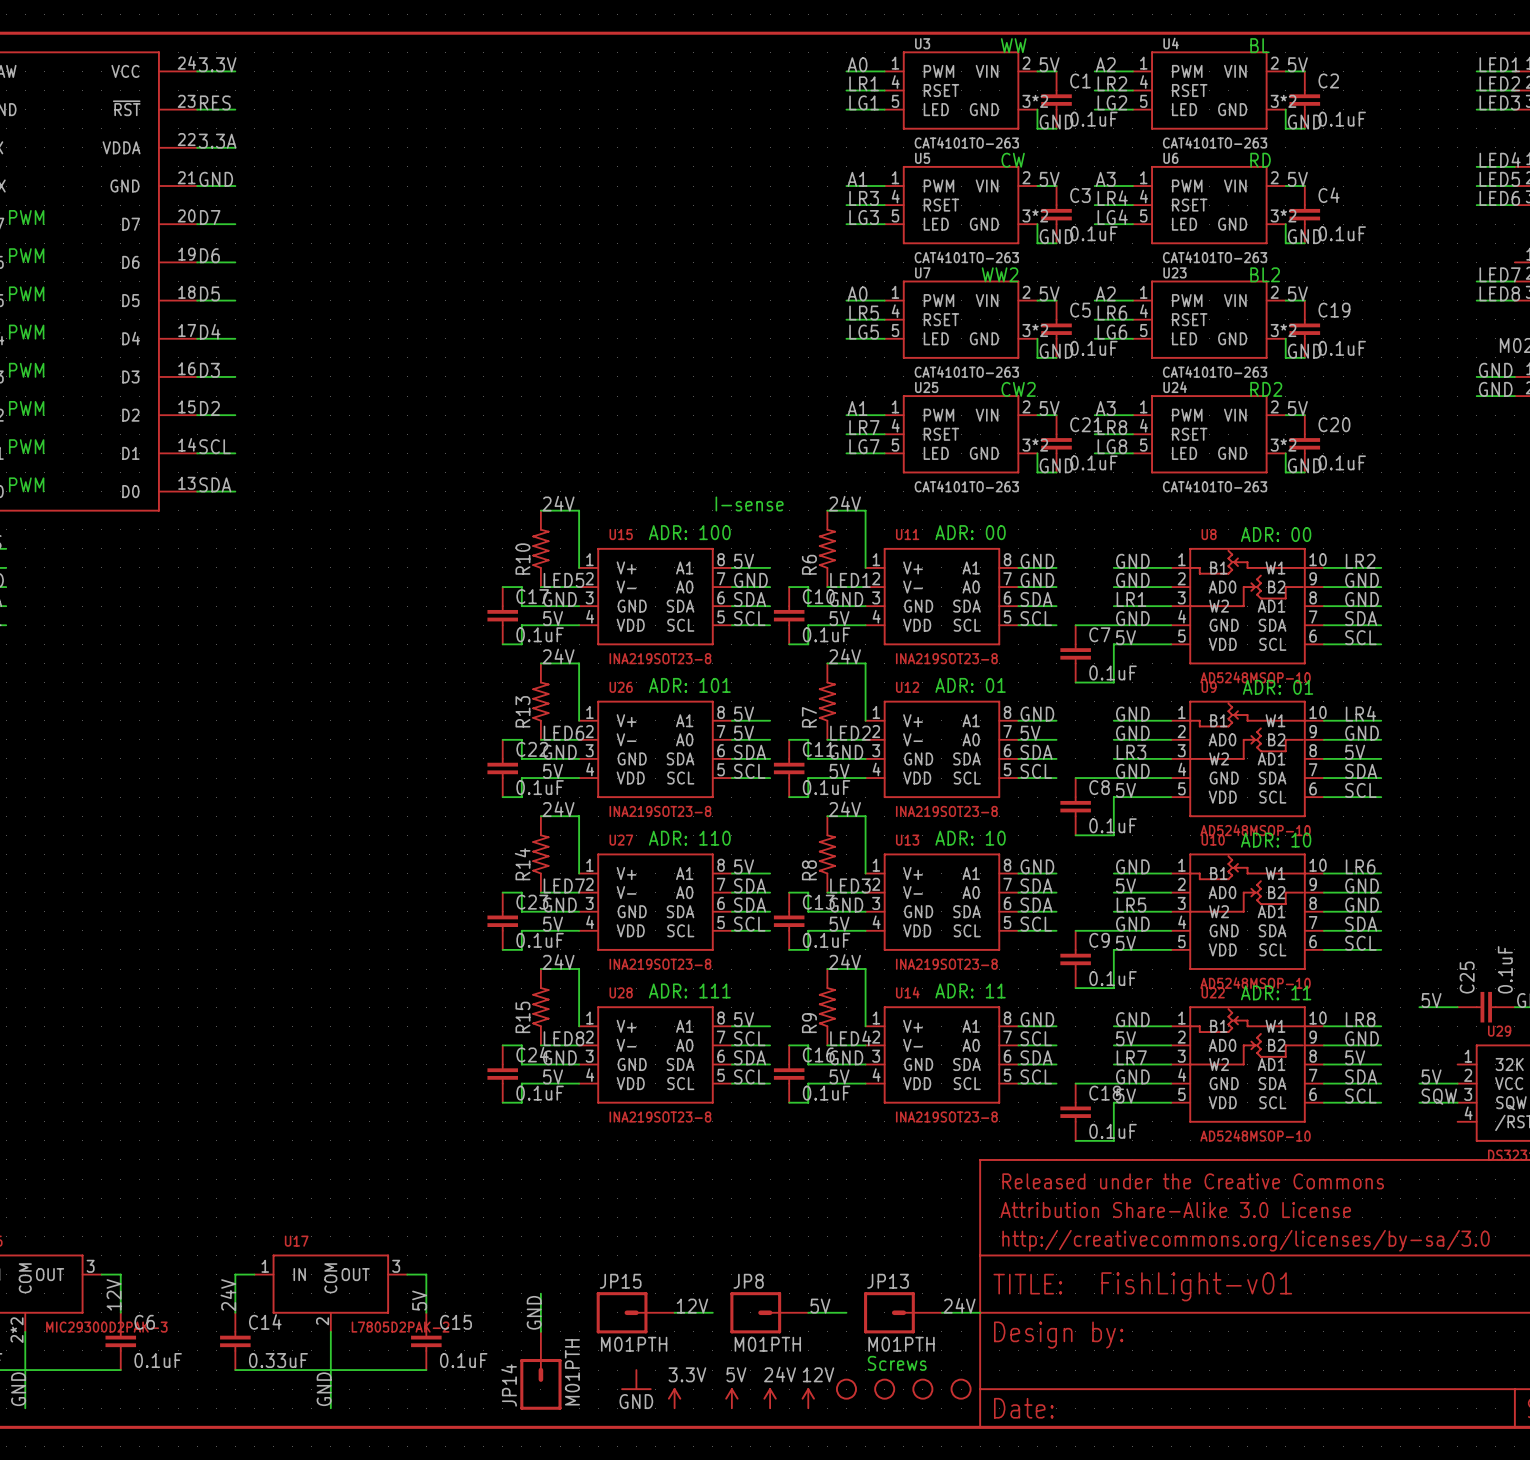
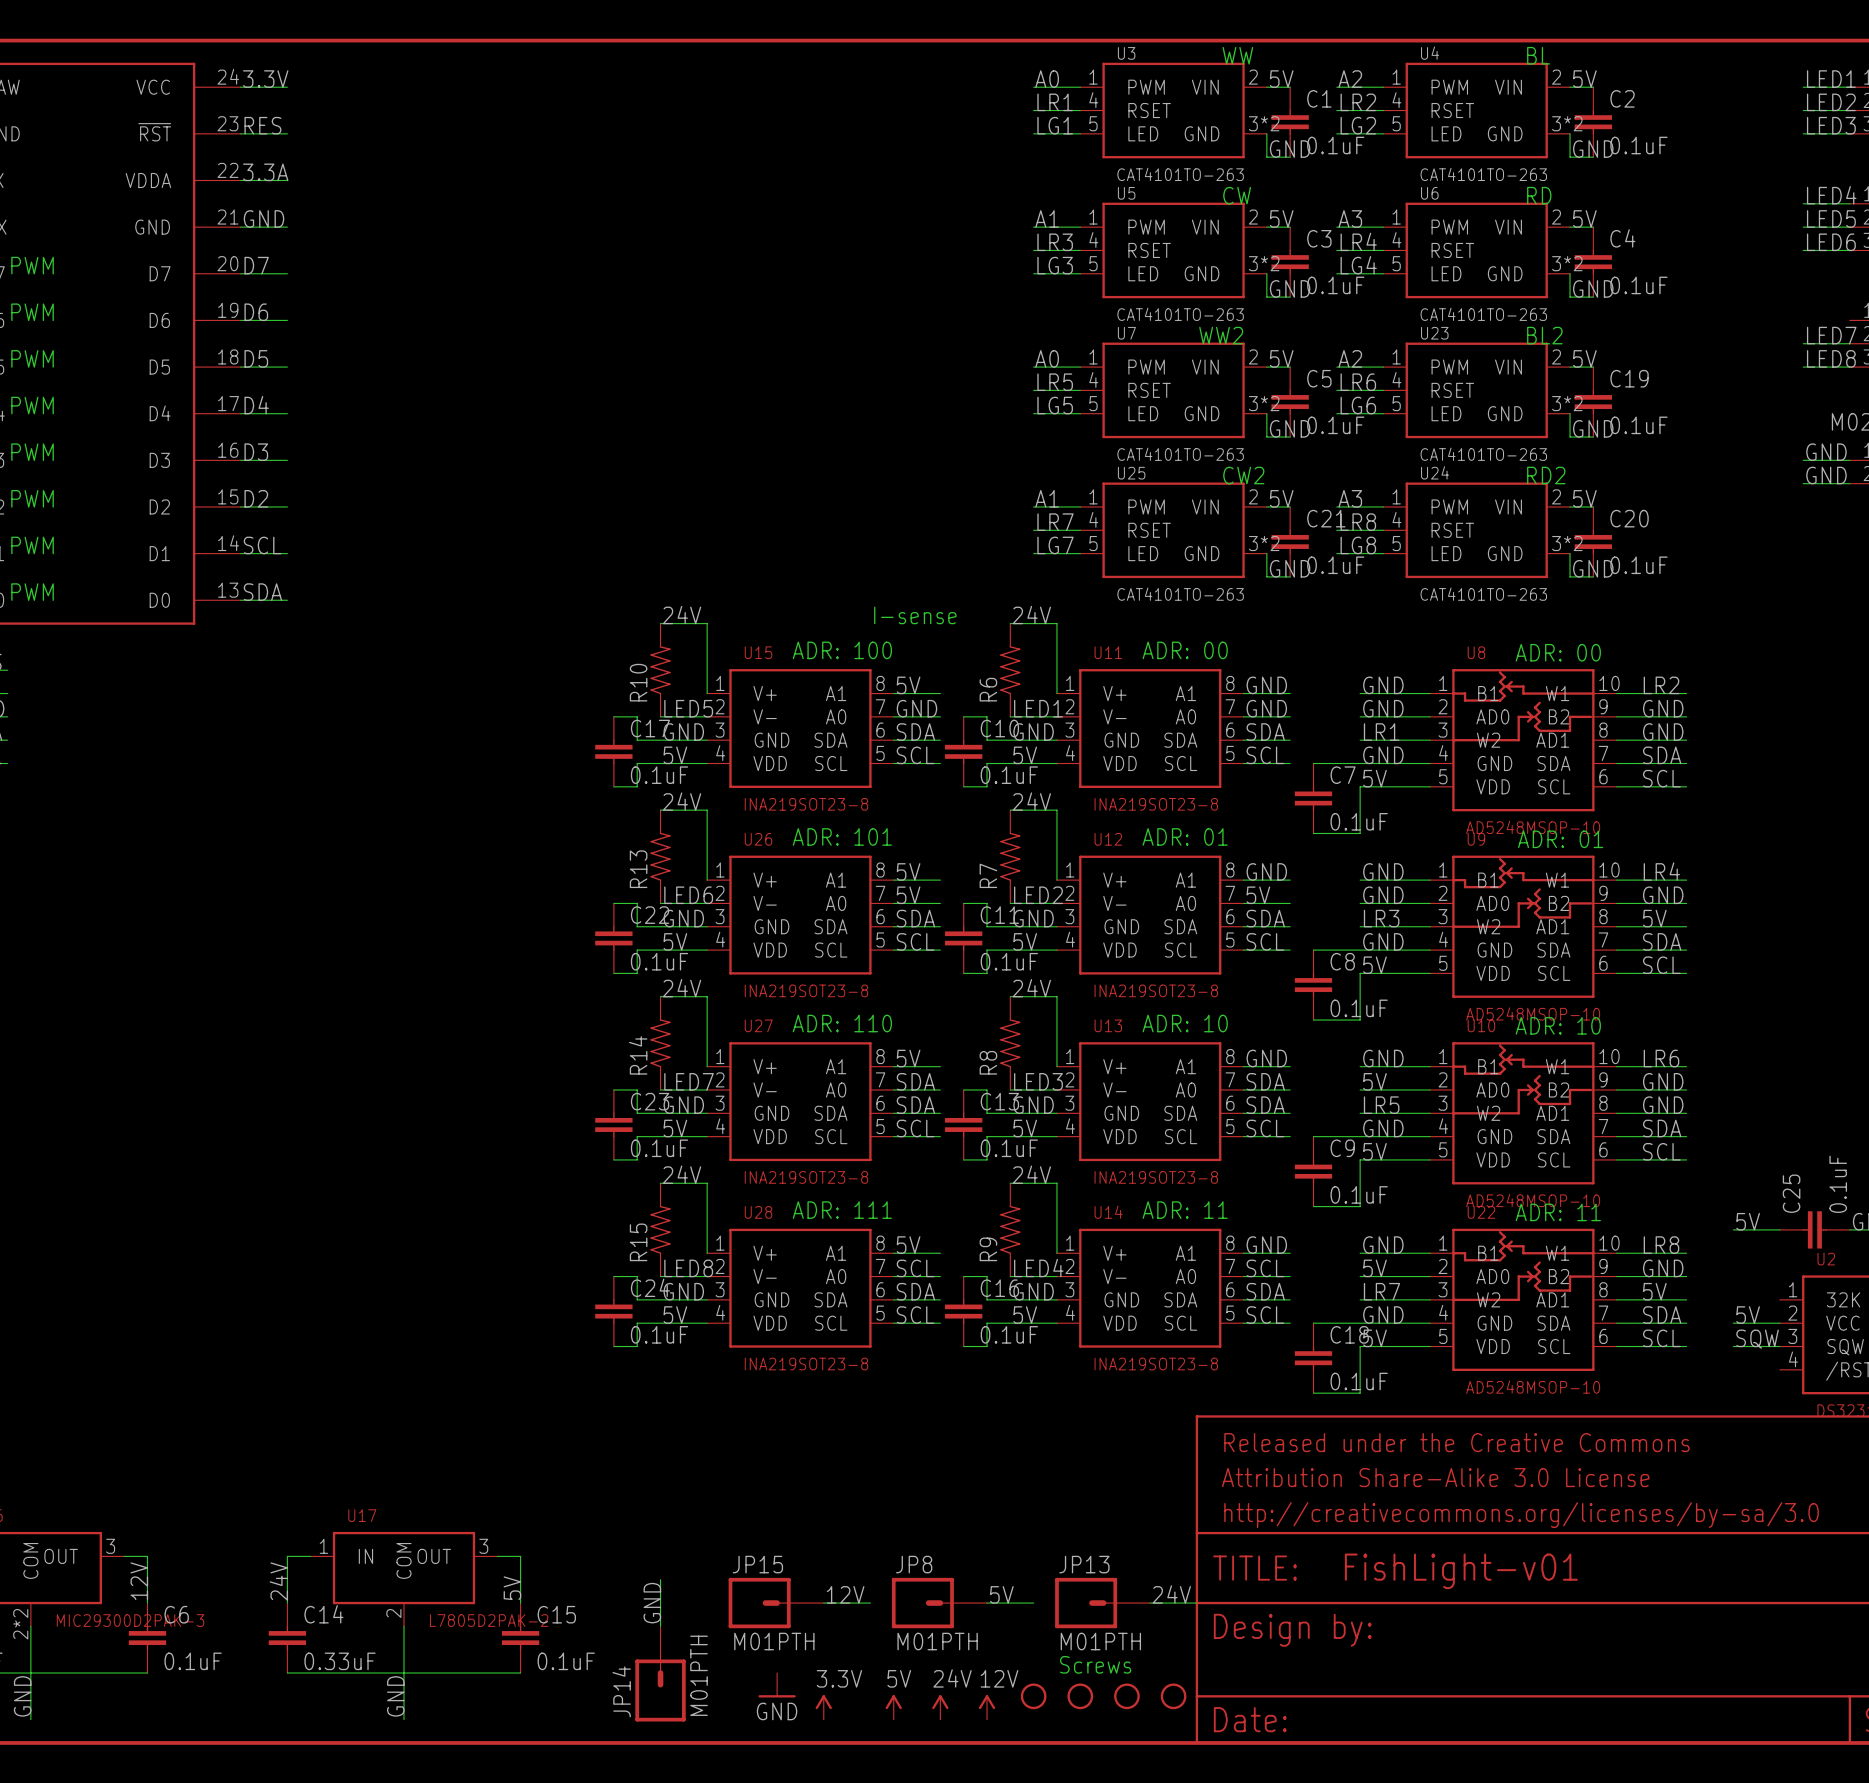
U29 name: U29 (1499, 1031) -> U2 (1826, 1259)

